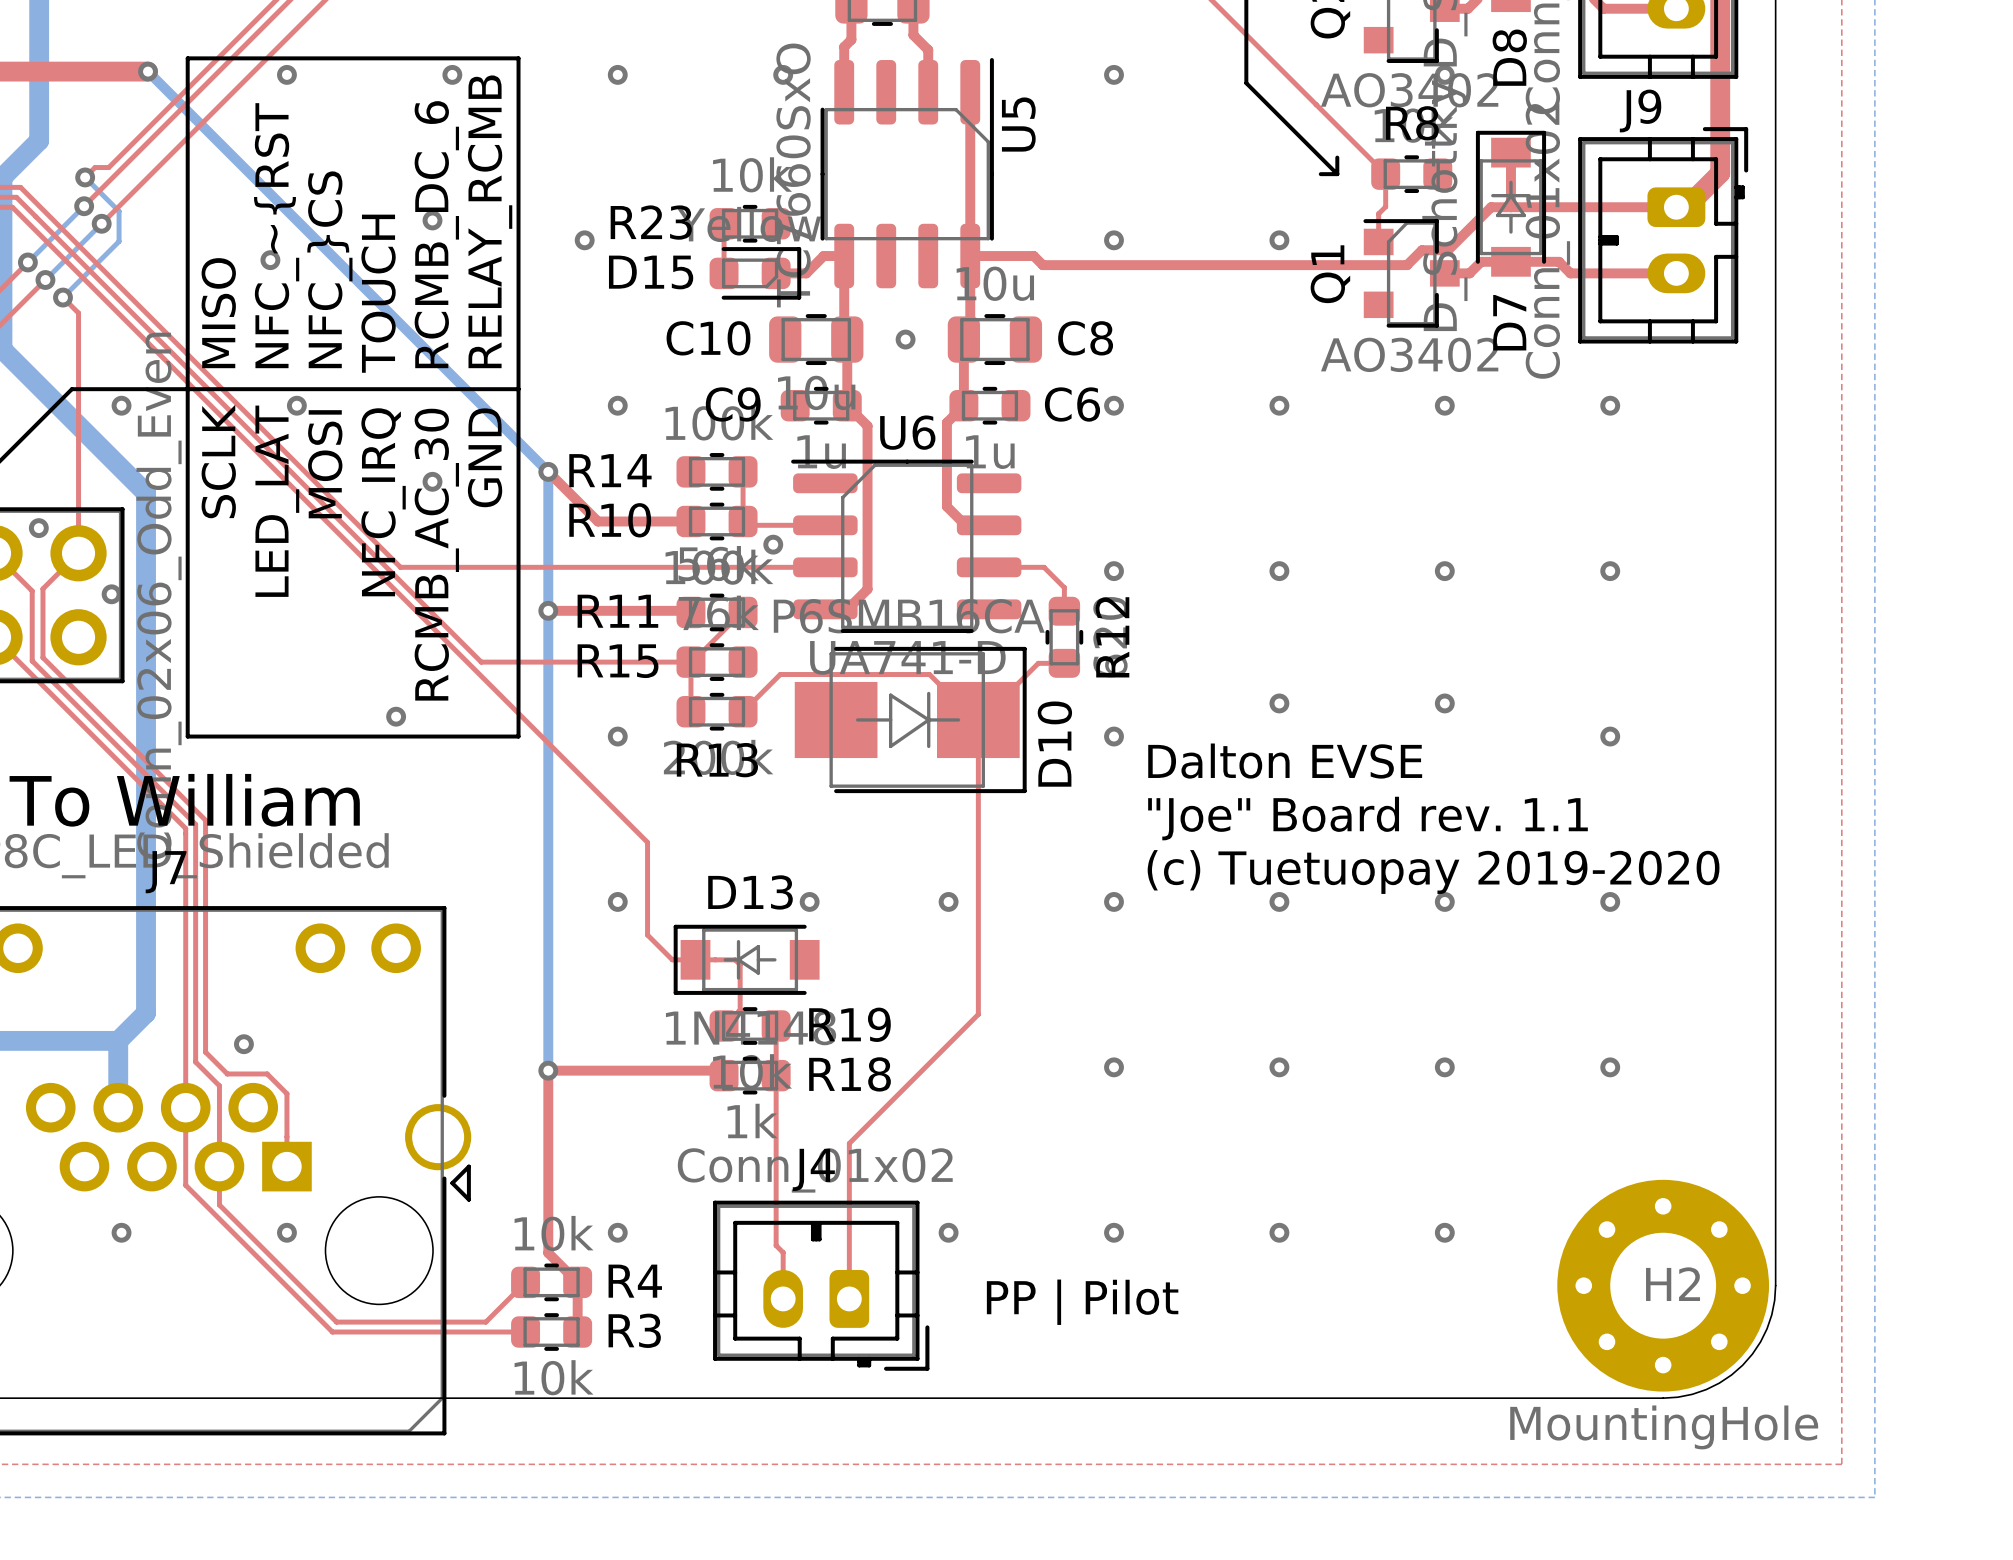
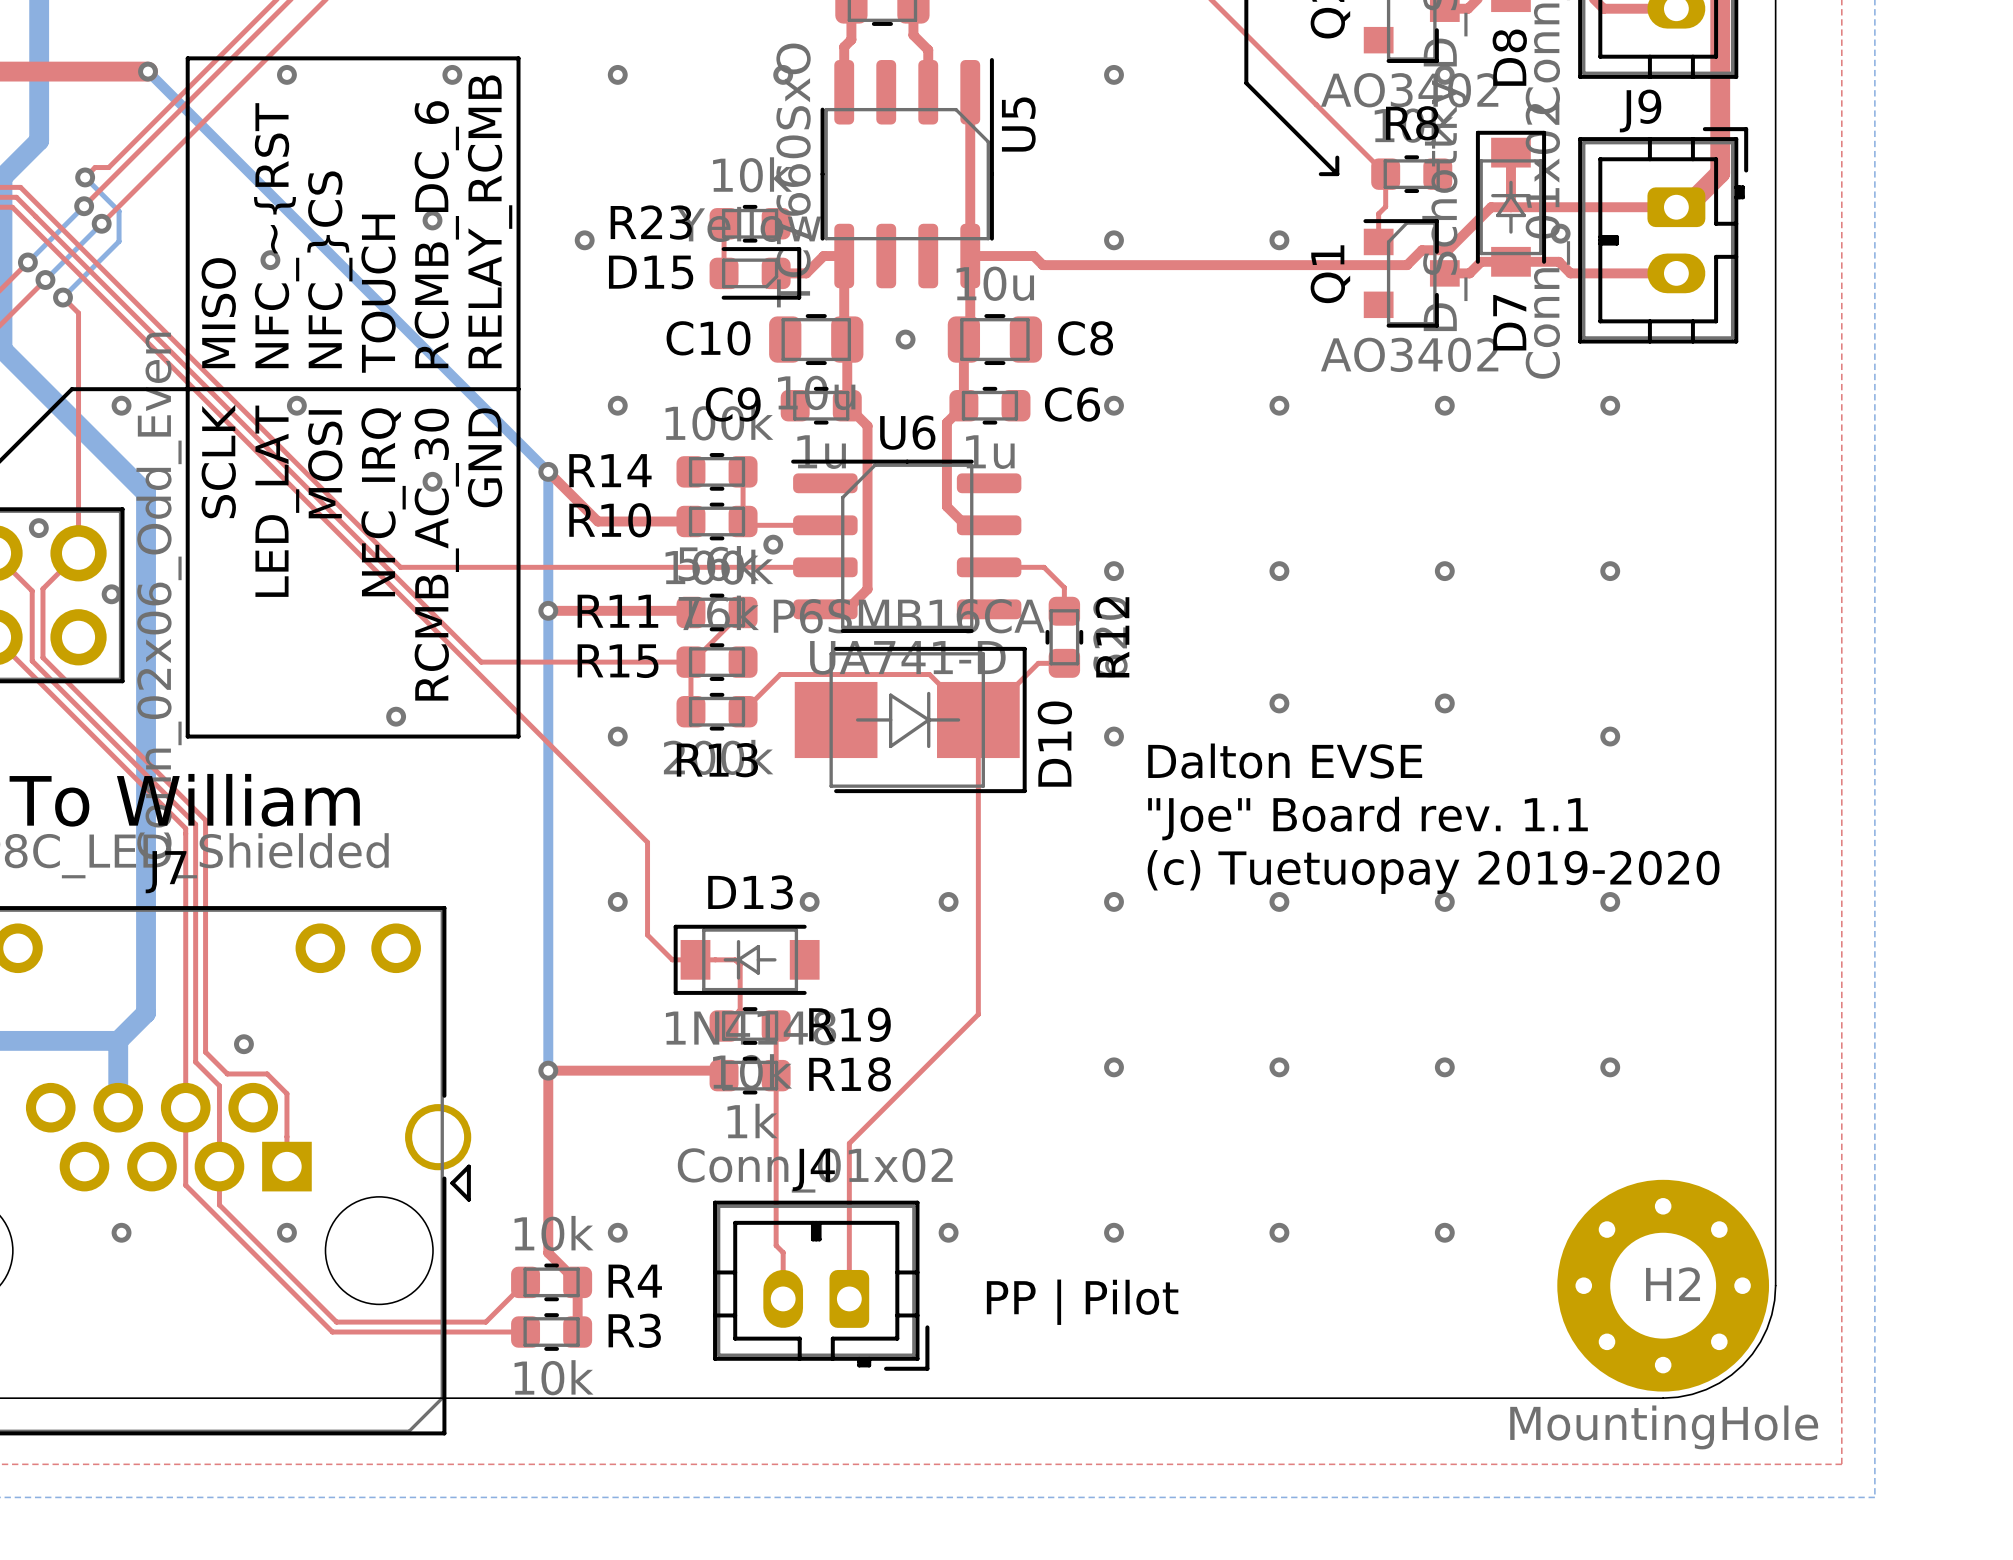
via: none -> (1560, 233)

